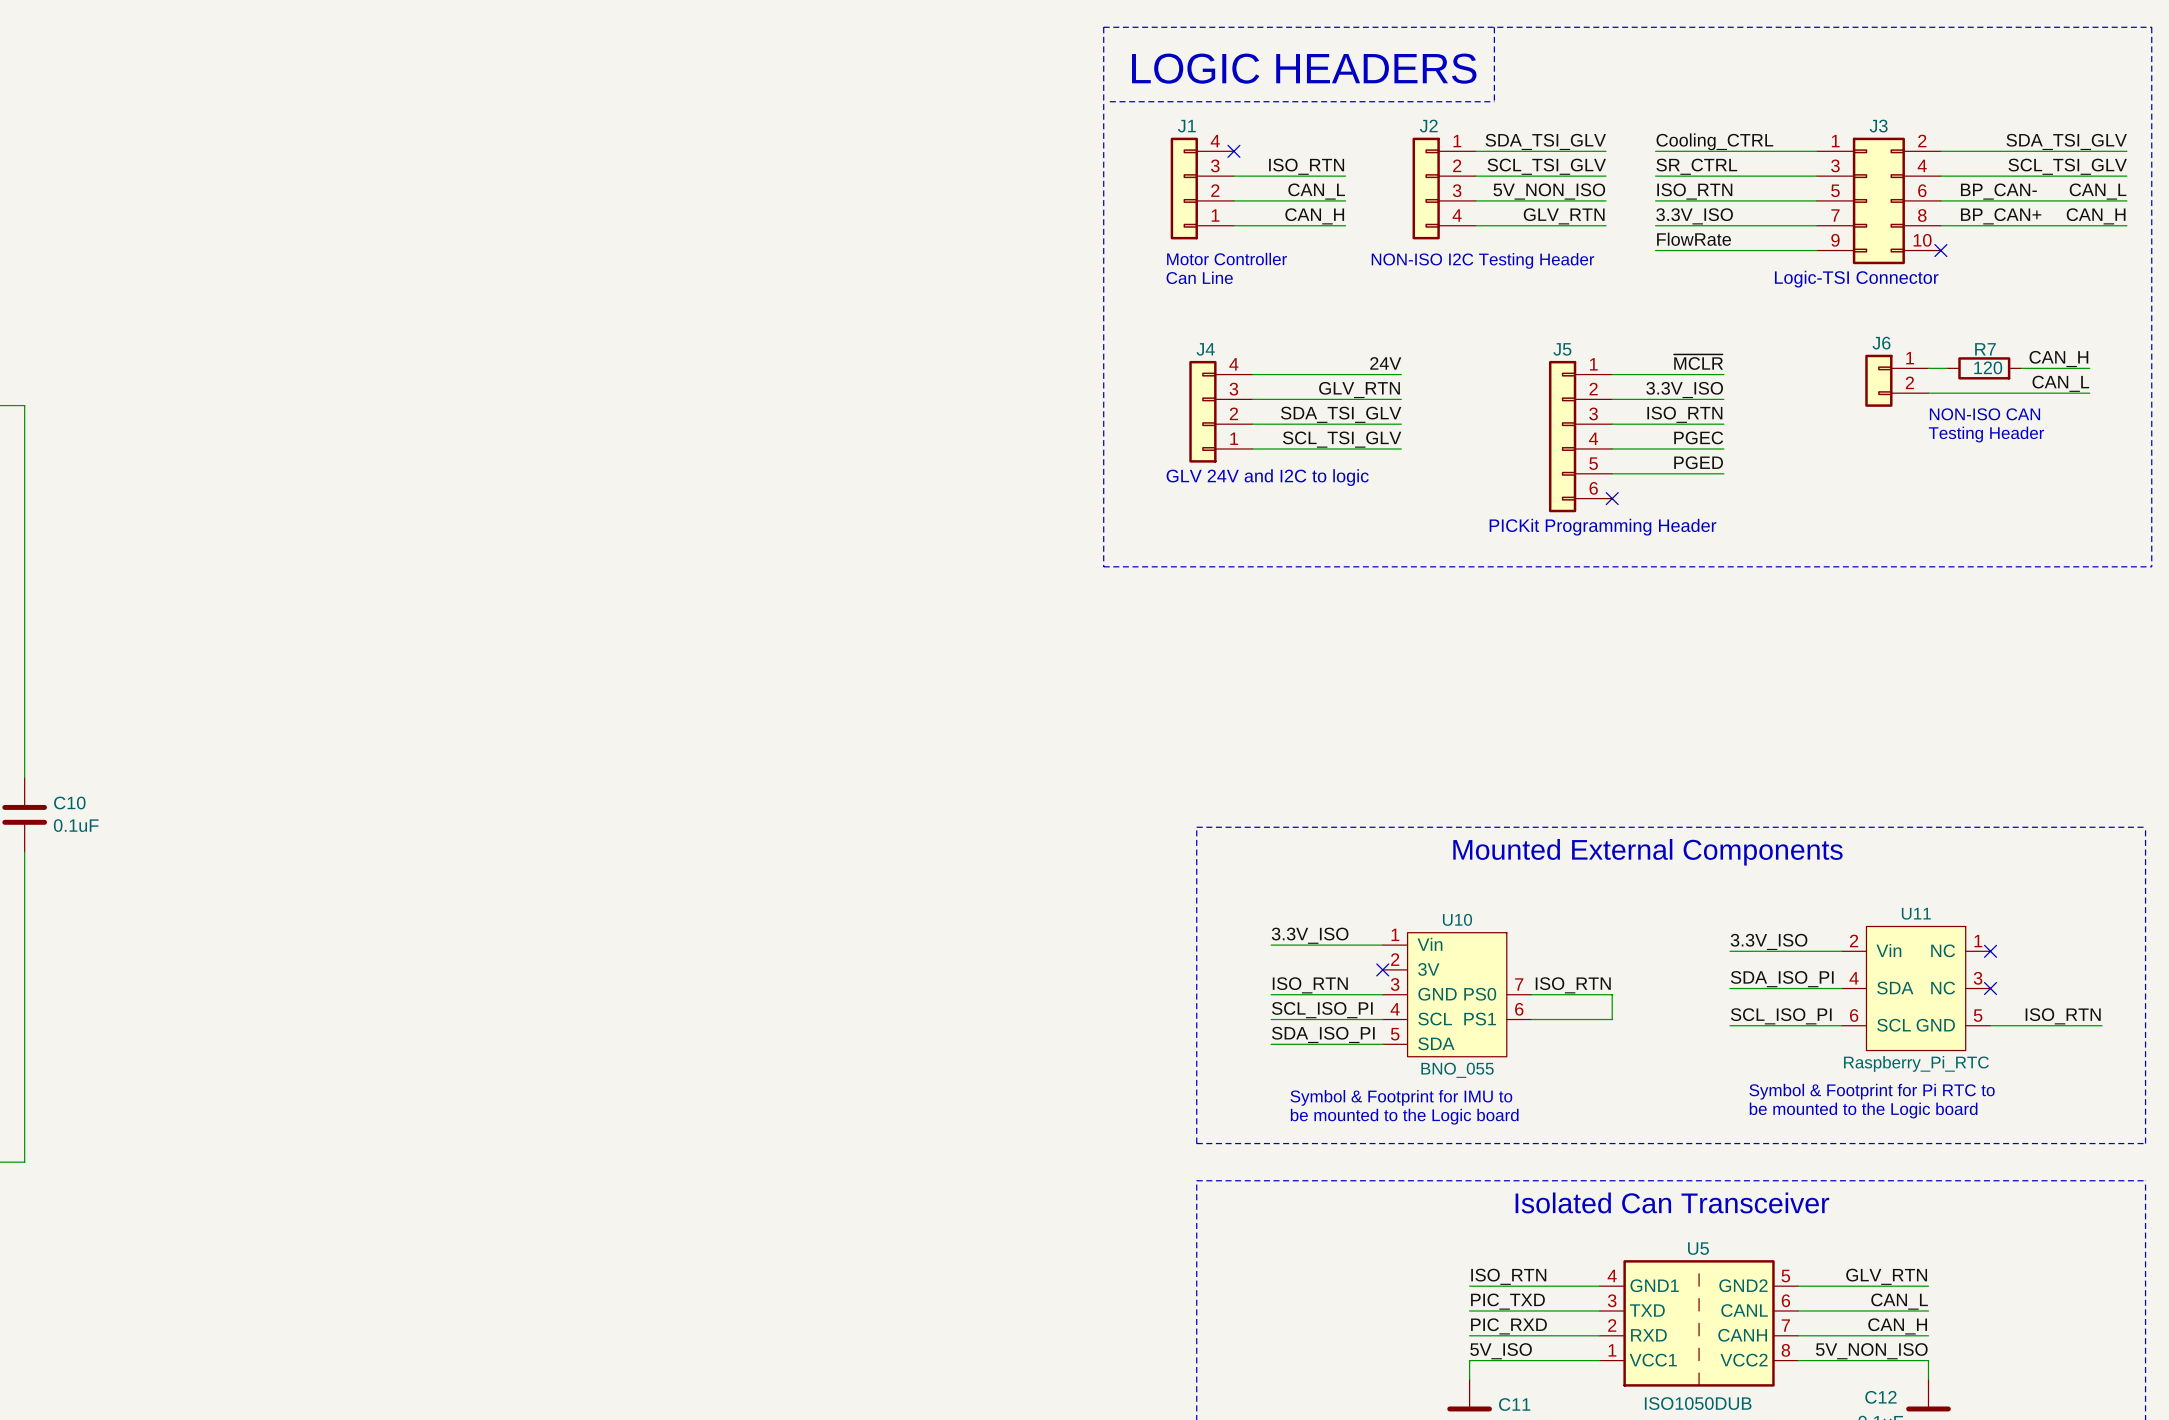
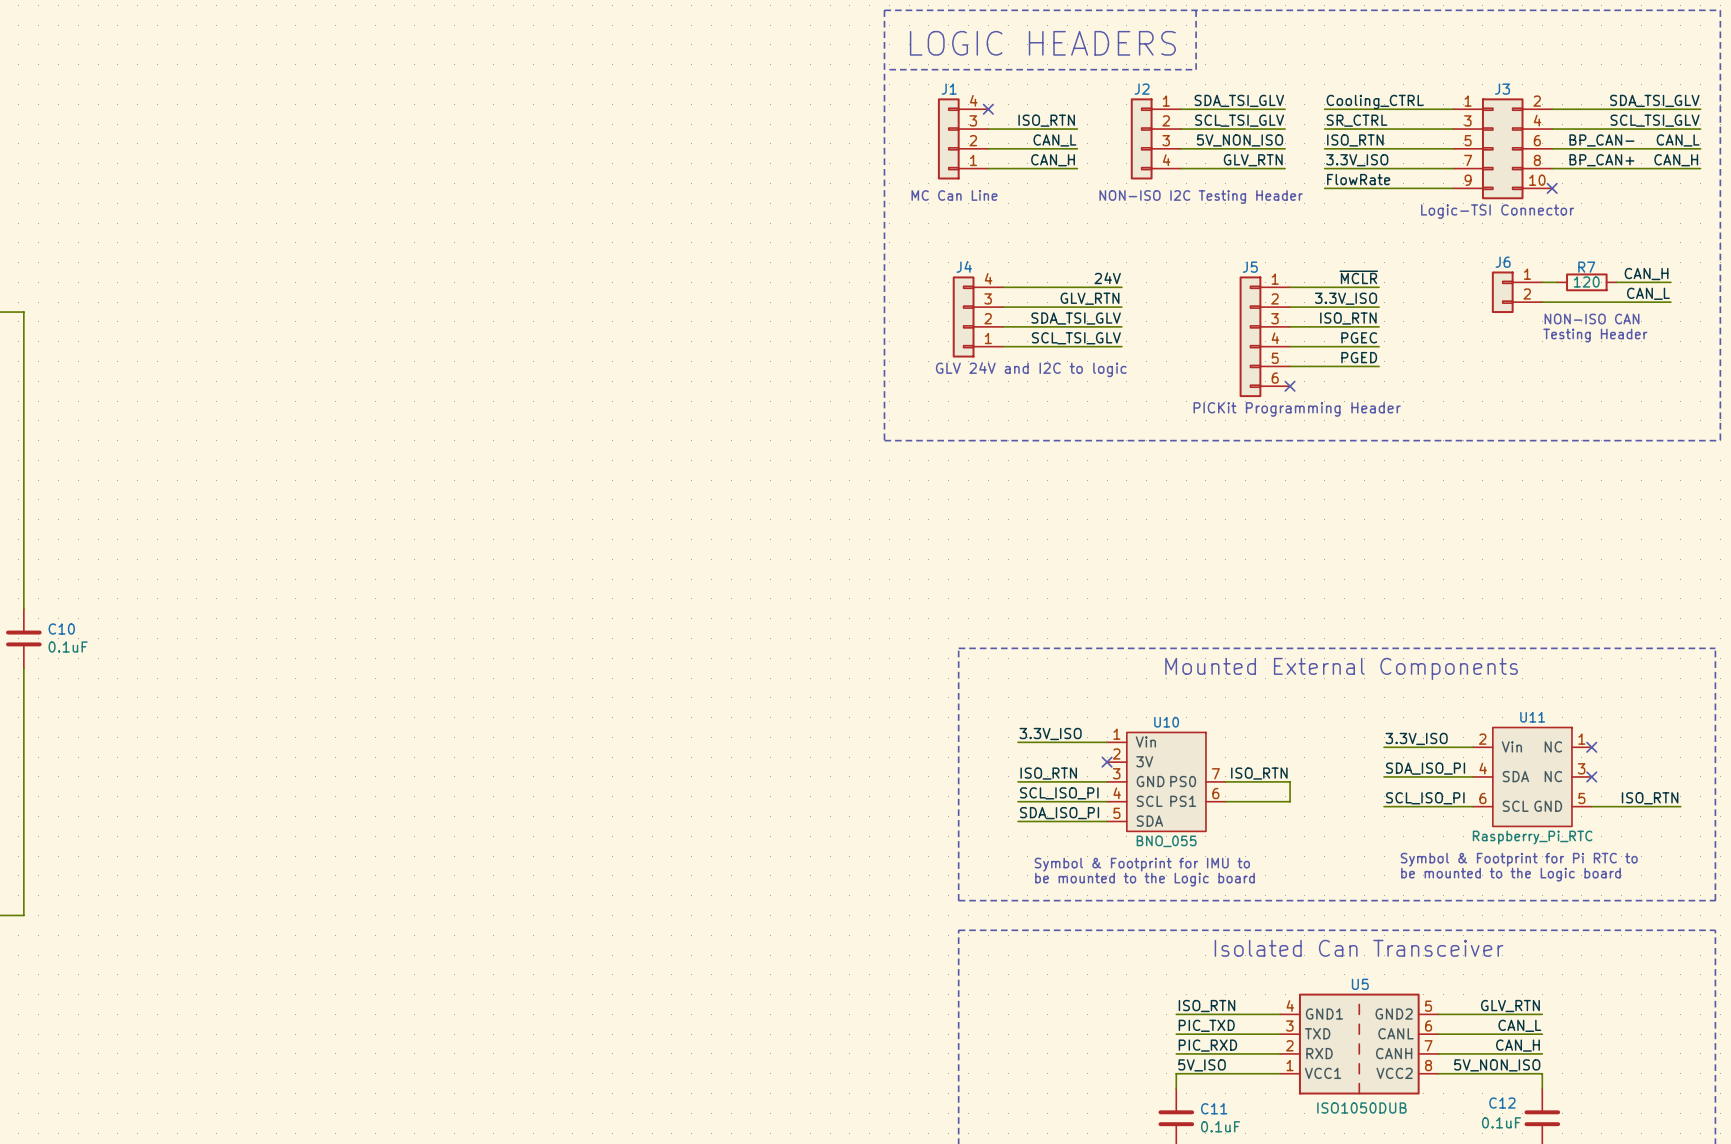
text: Motor Controller (1227, 259) -> none
text: Can Line (1199, 277) -> MC Can Line (954, 195)

